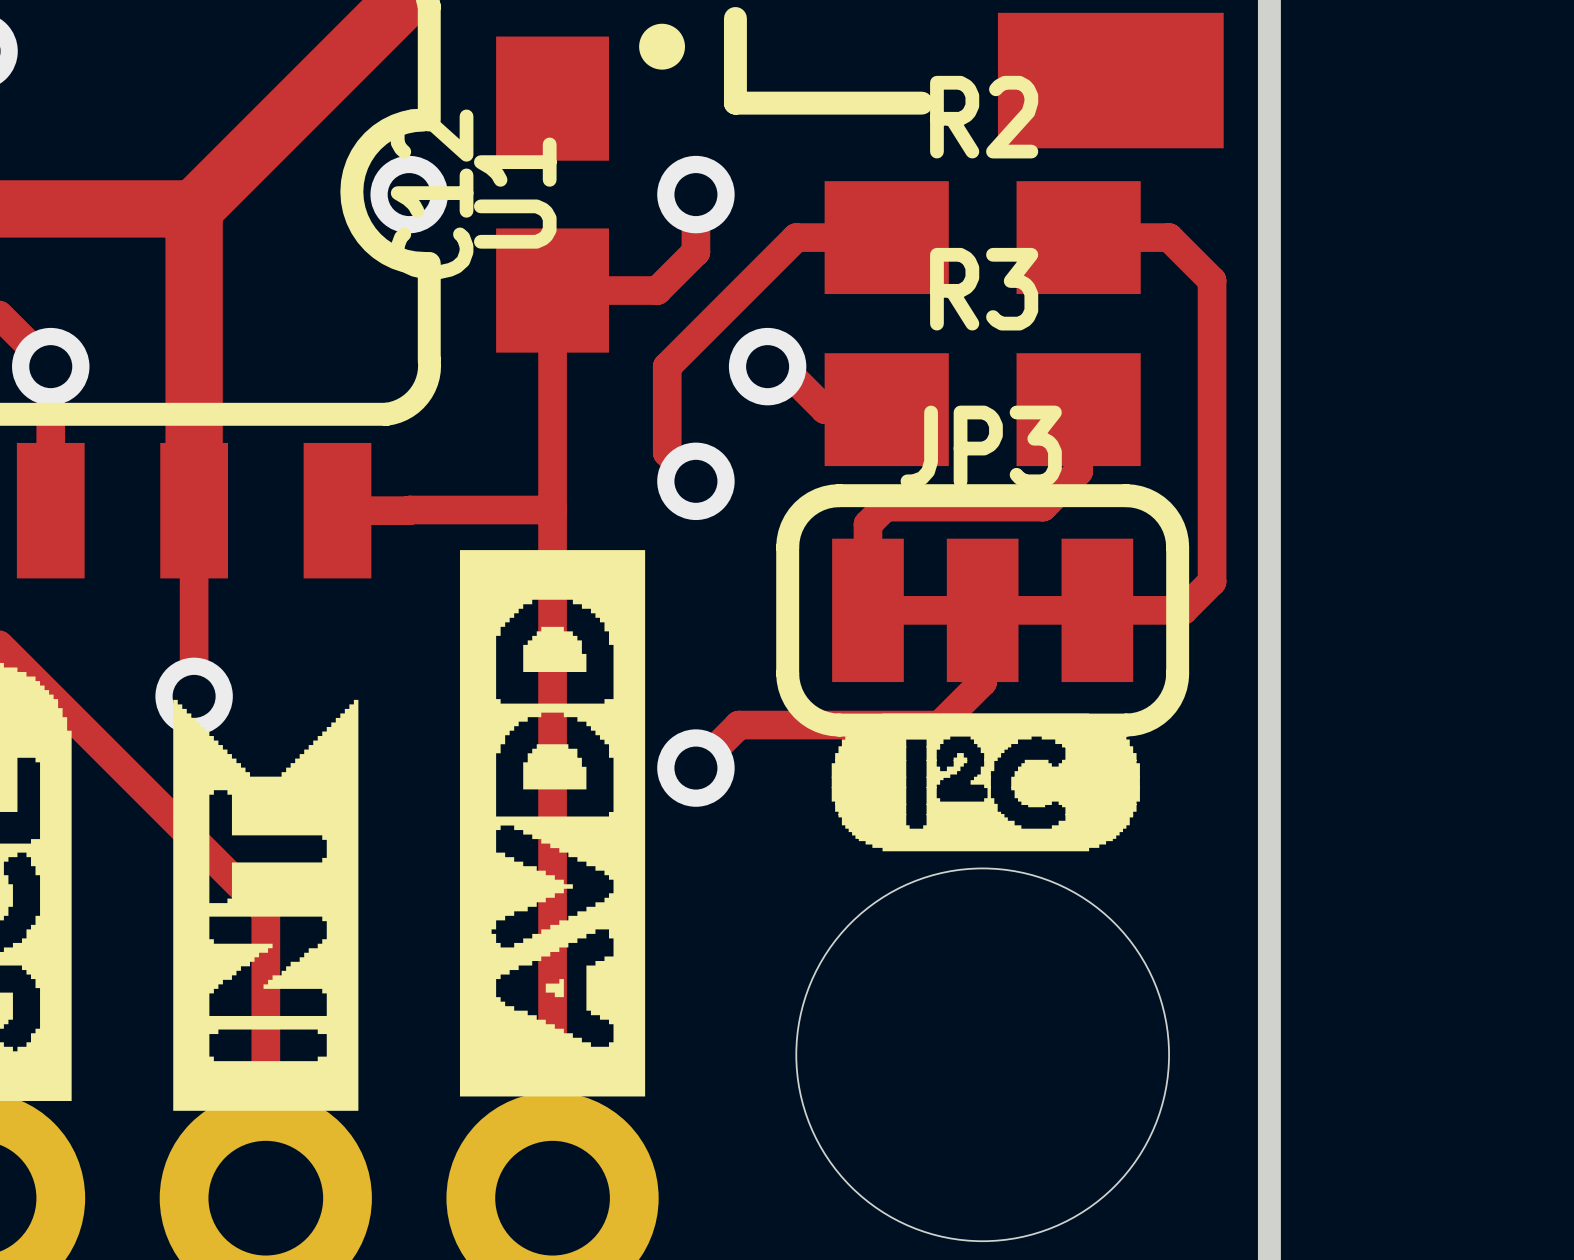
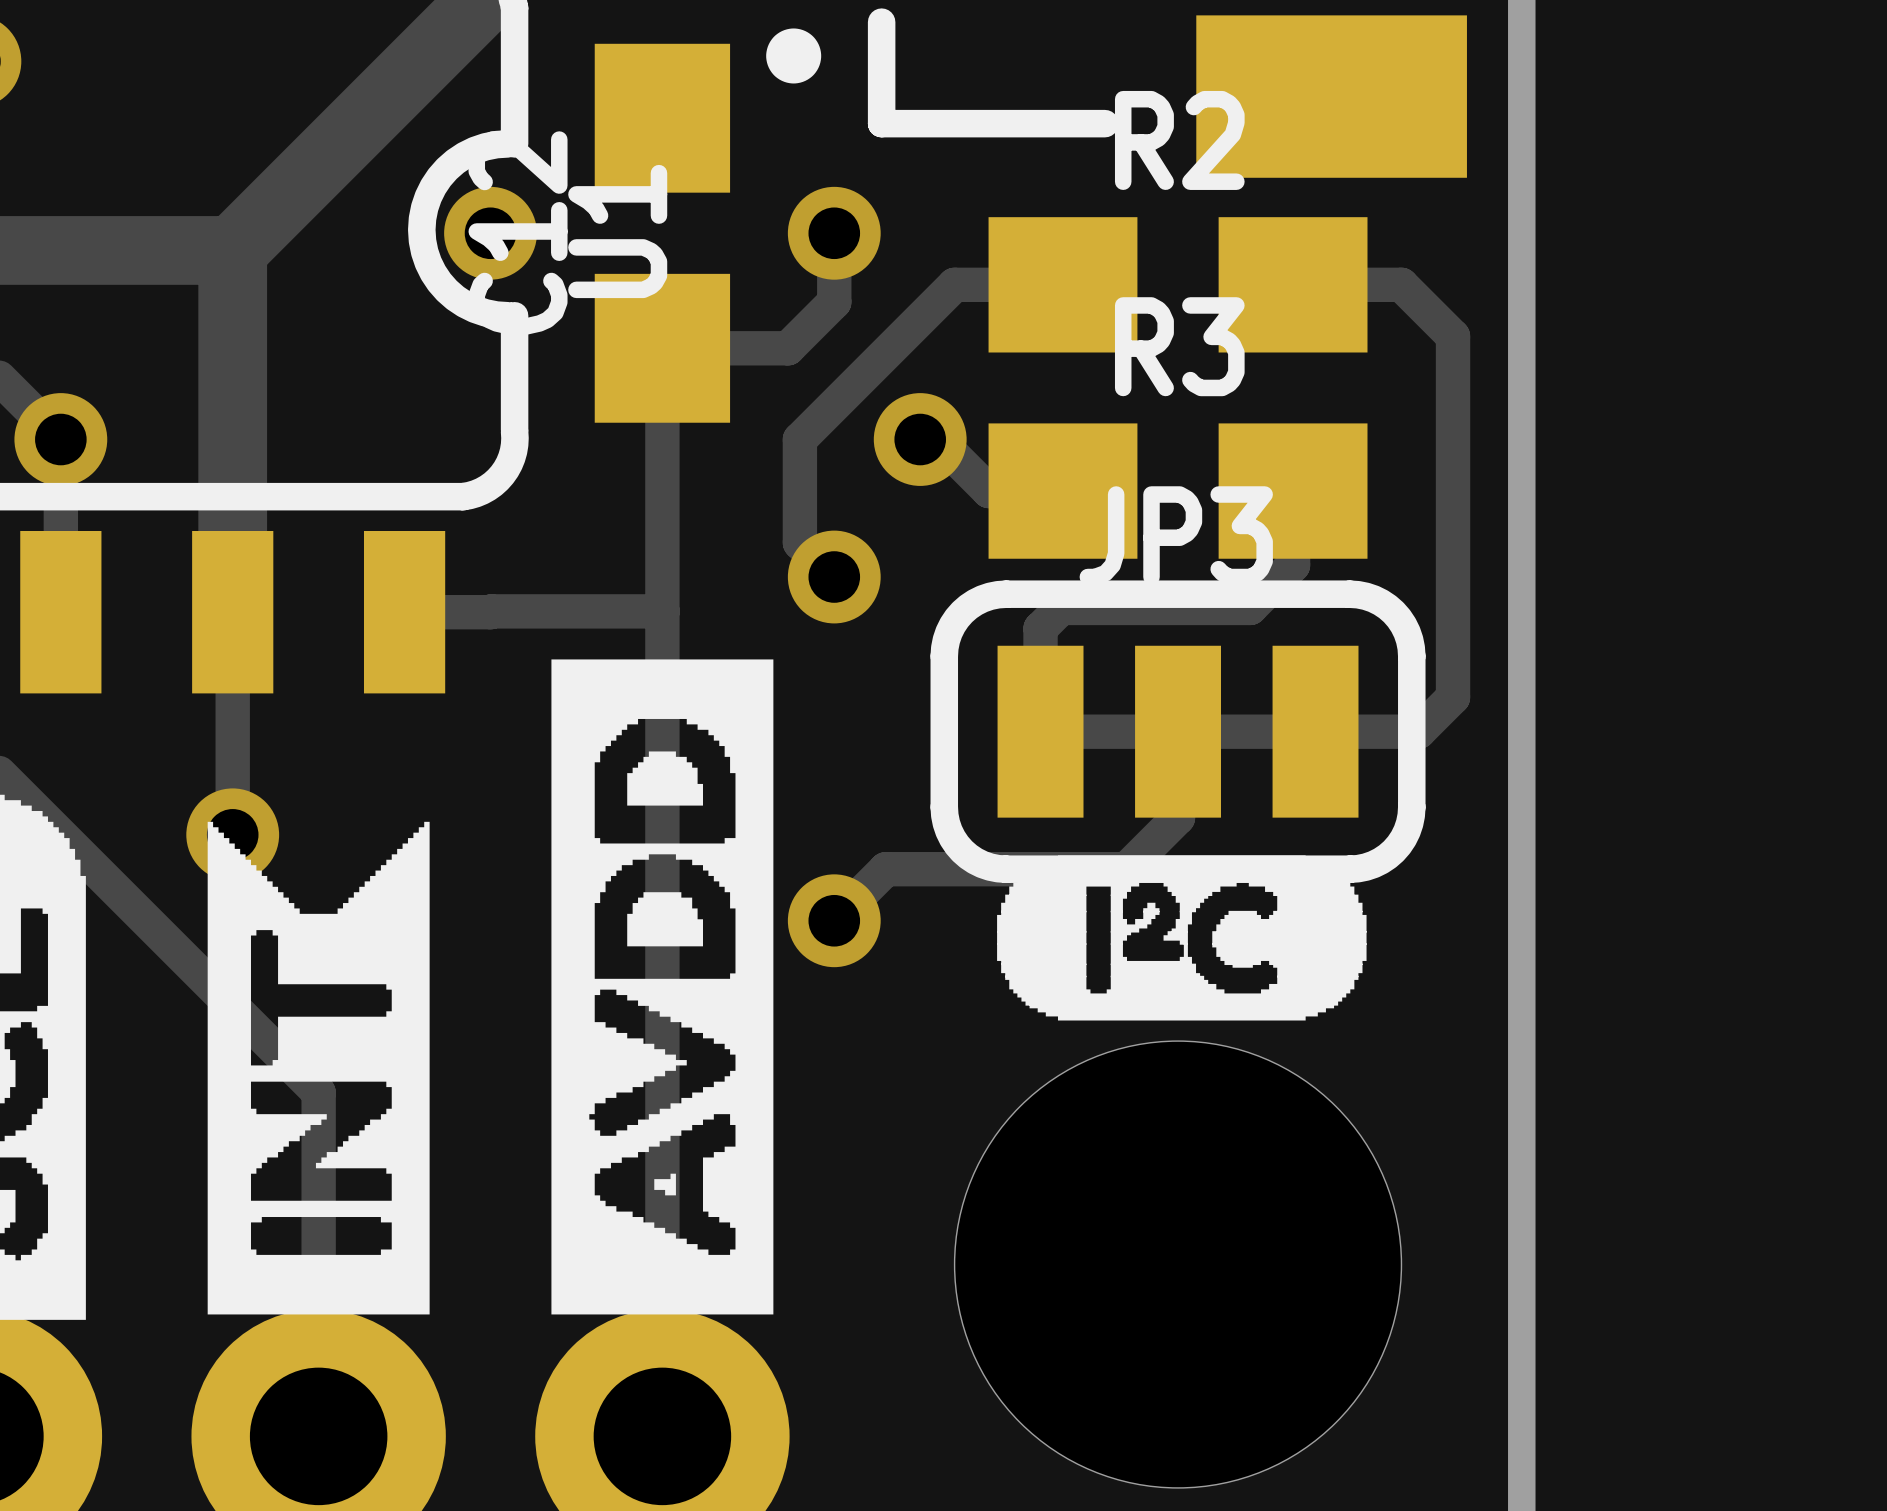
drawing position: (265, 905) -> (318, 1068)

